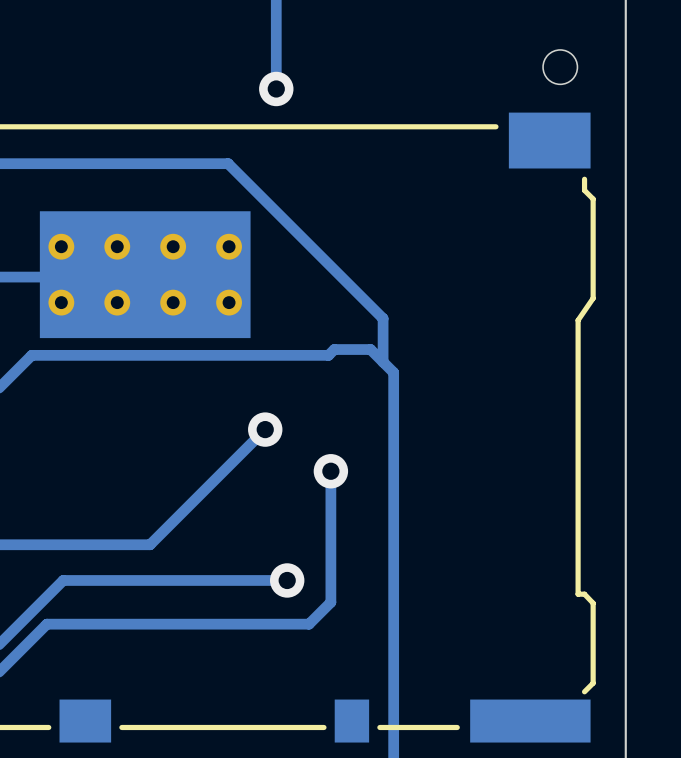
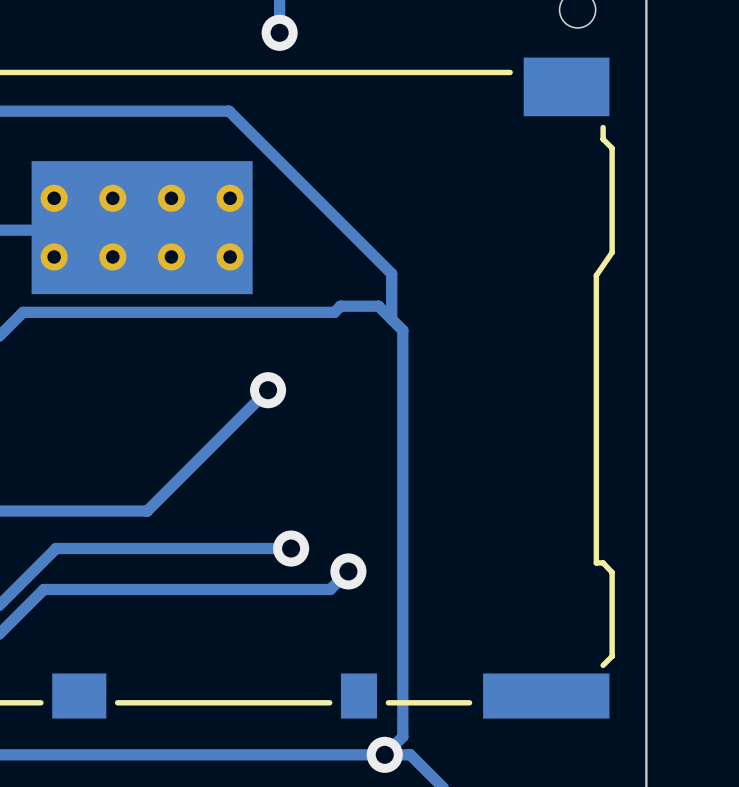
track: (330, 471) (330, 602) (309, 624) (46, 624) -> (348, 571) (330, 589) (43, 589) (38, 594)
via position: (330, 471) -> (348, 571)

